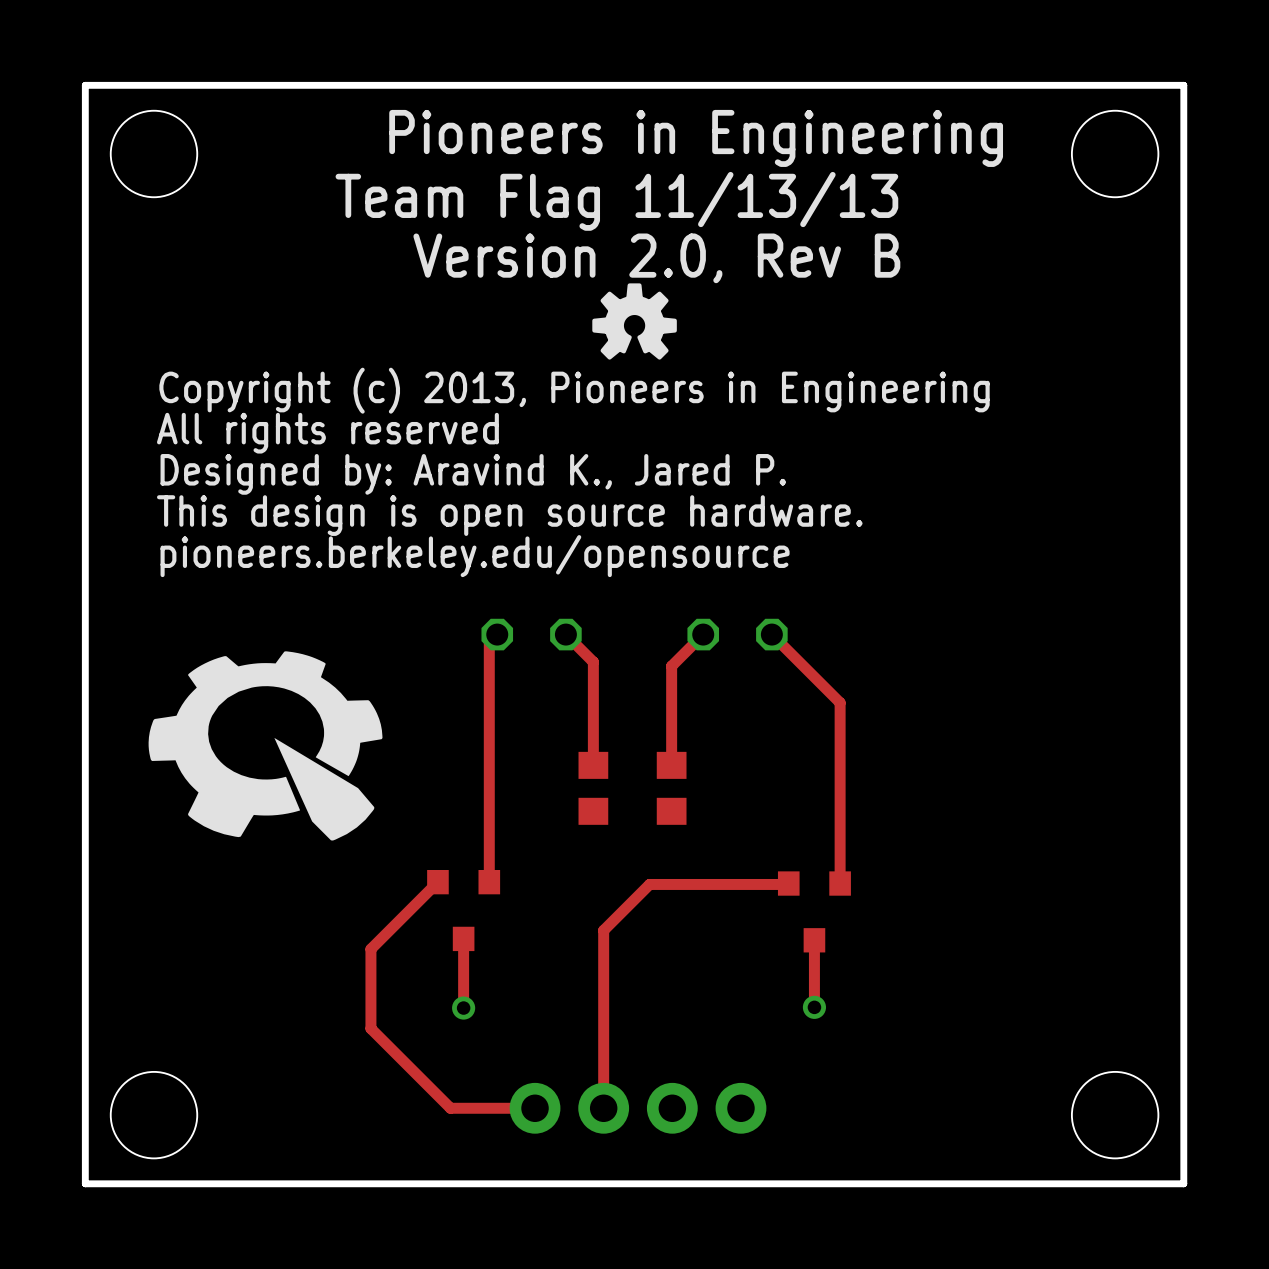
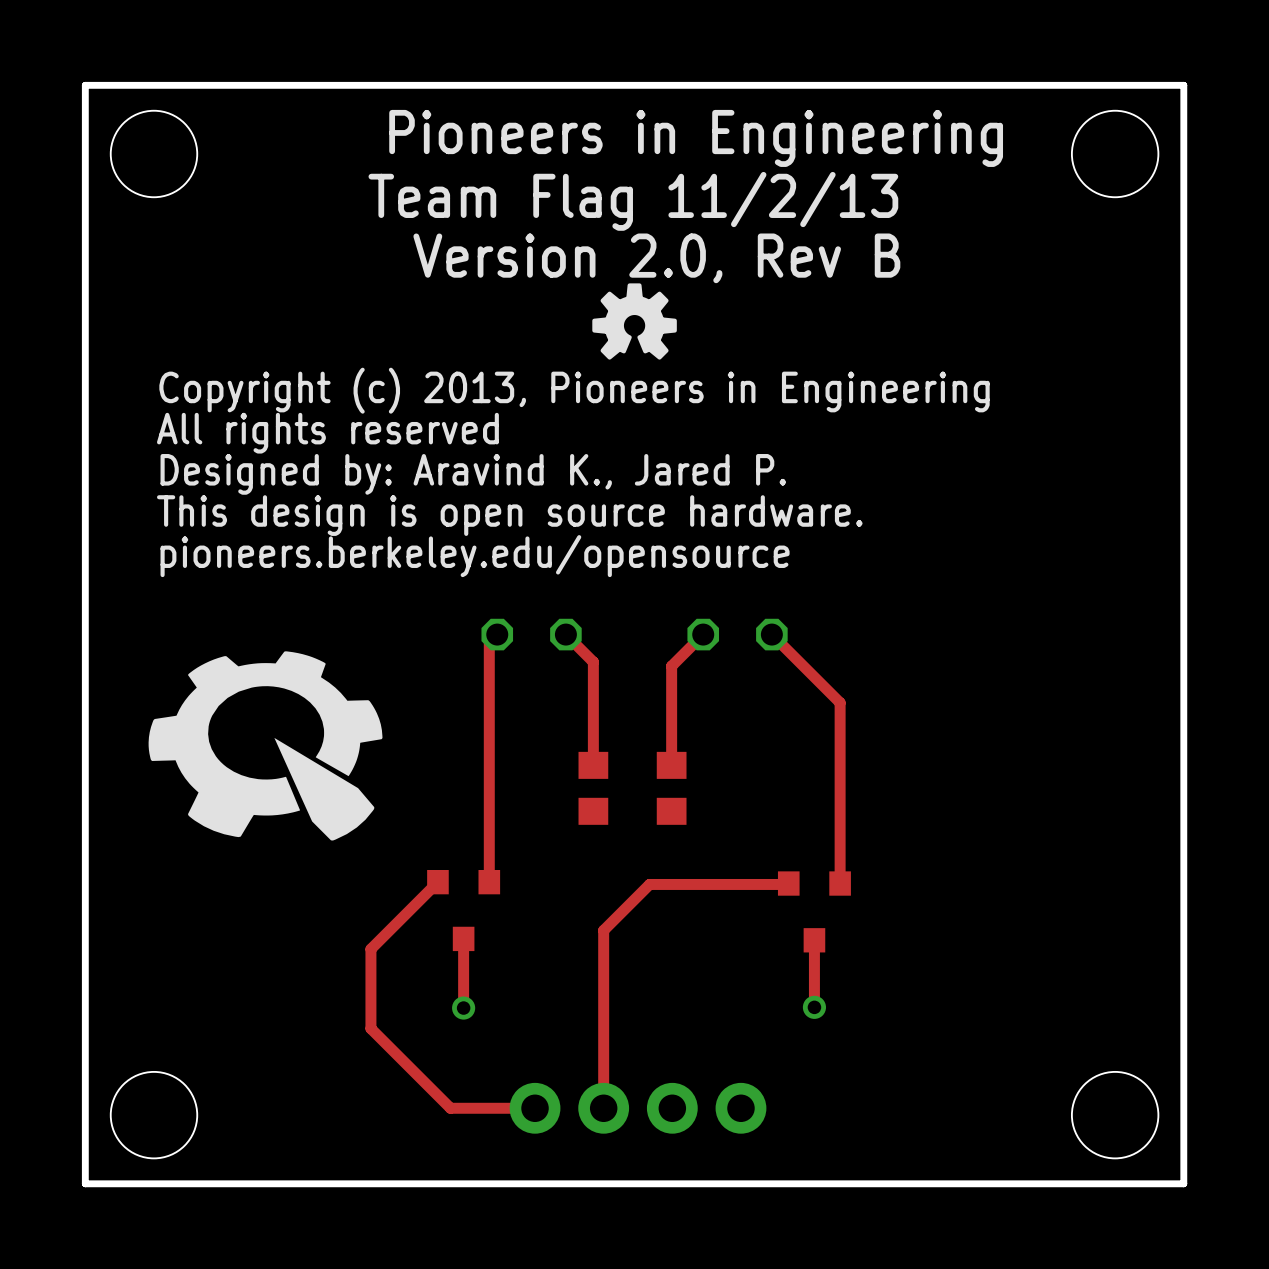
text: Team Flag 11/13/13 (616, 201) -> Team Flag 11/2/13 (633, 201)

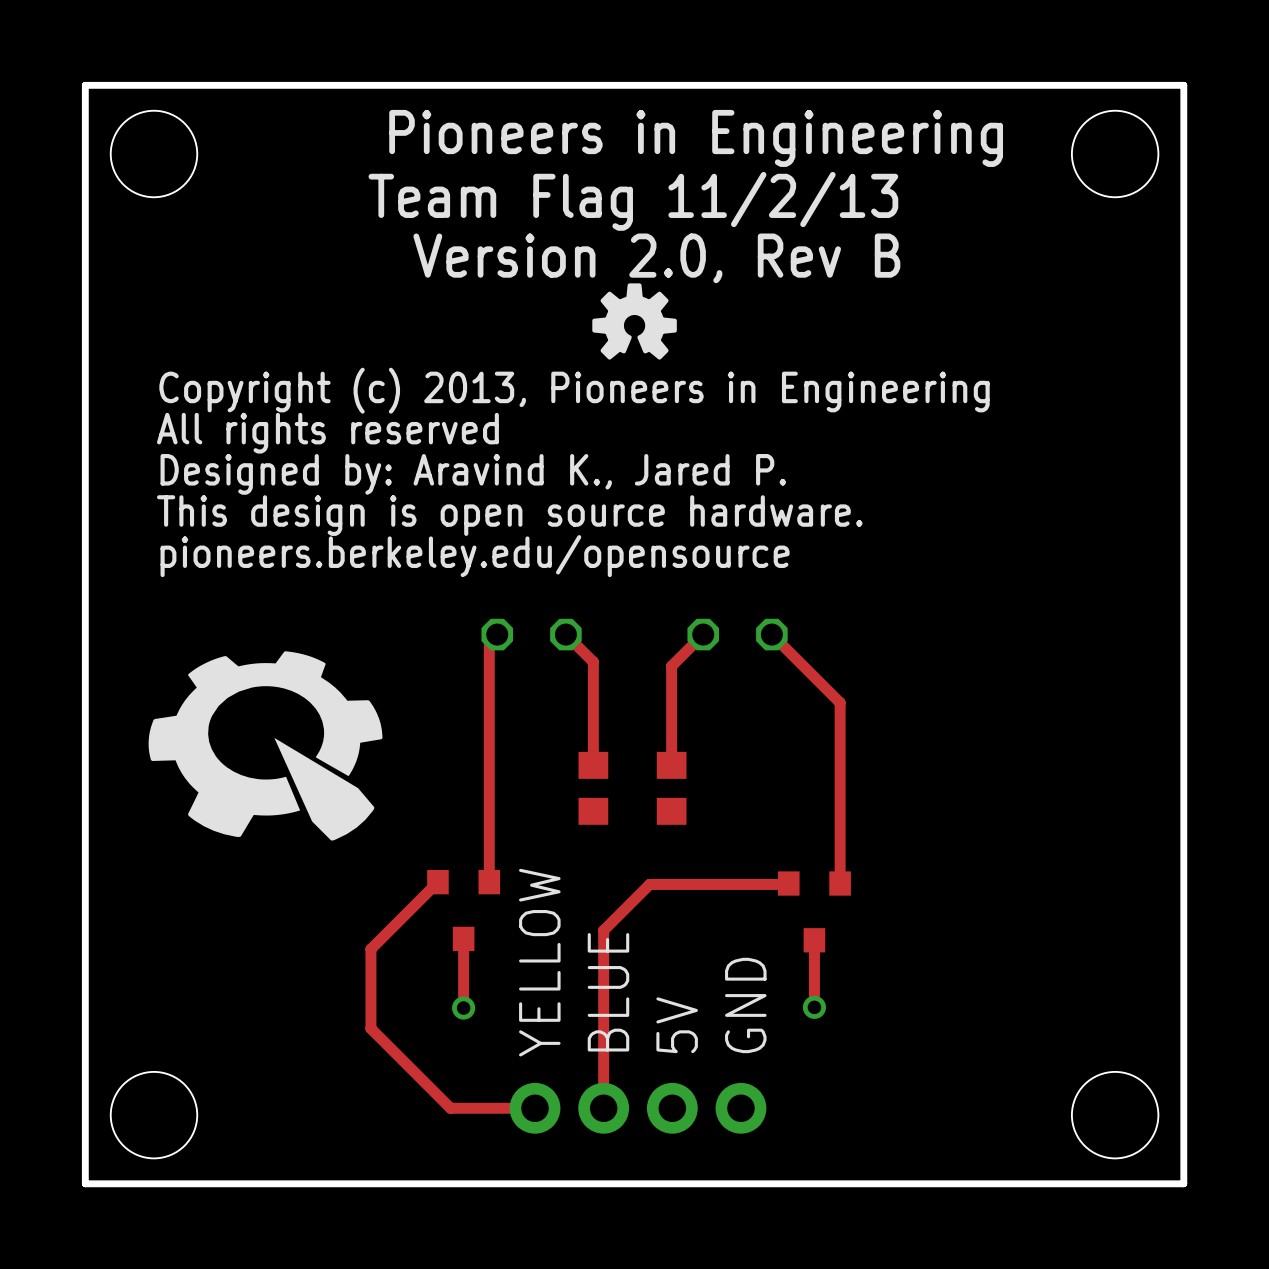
text: none -> YELLOW (539, 962)
text: none -> BLUE (608, 992)
text: none -> GND (745, 1005)
text: none -> 5V (677, 1025)

